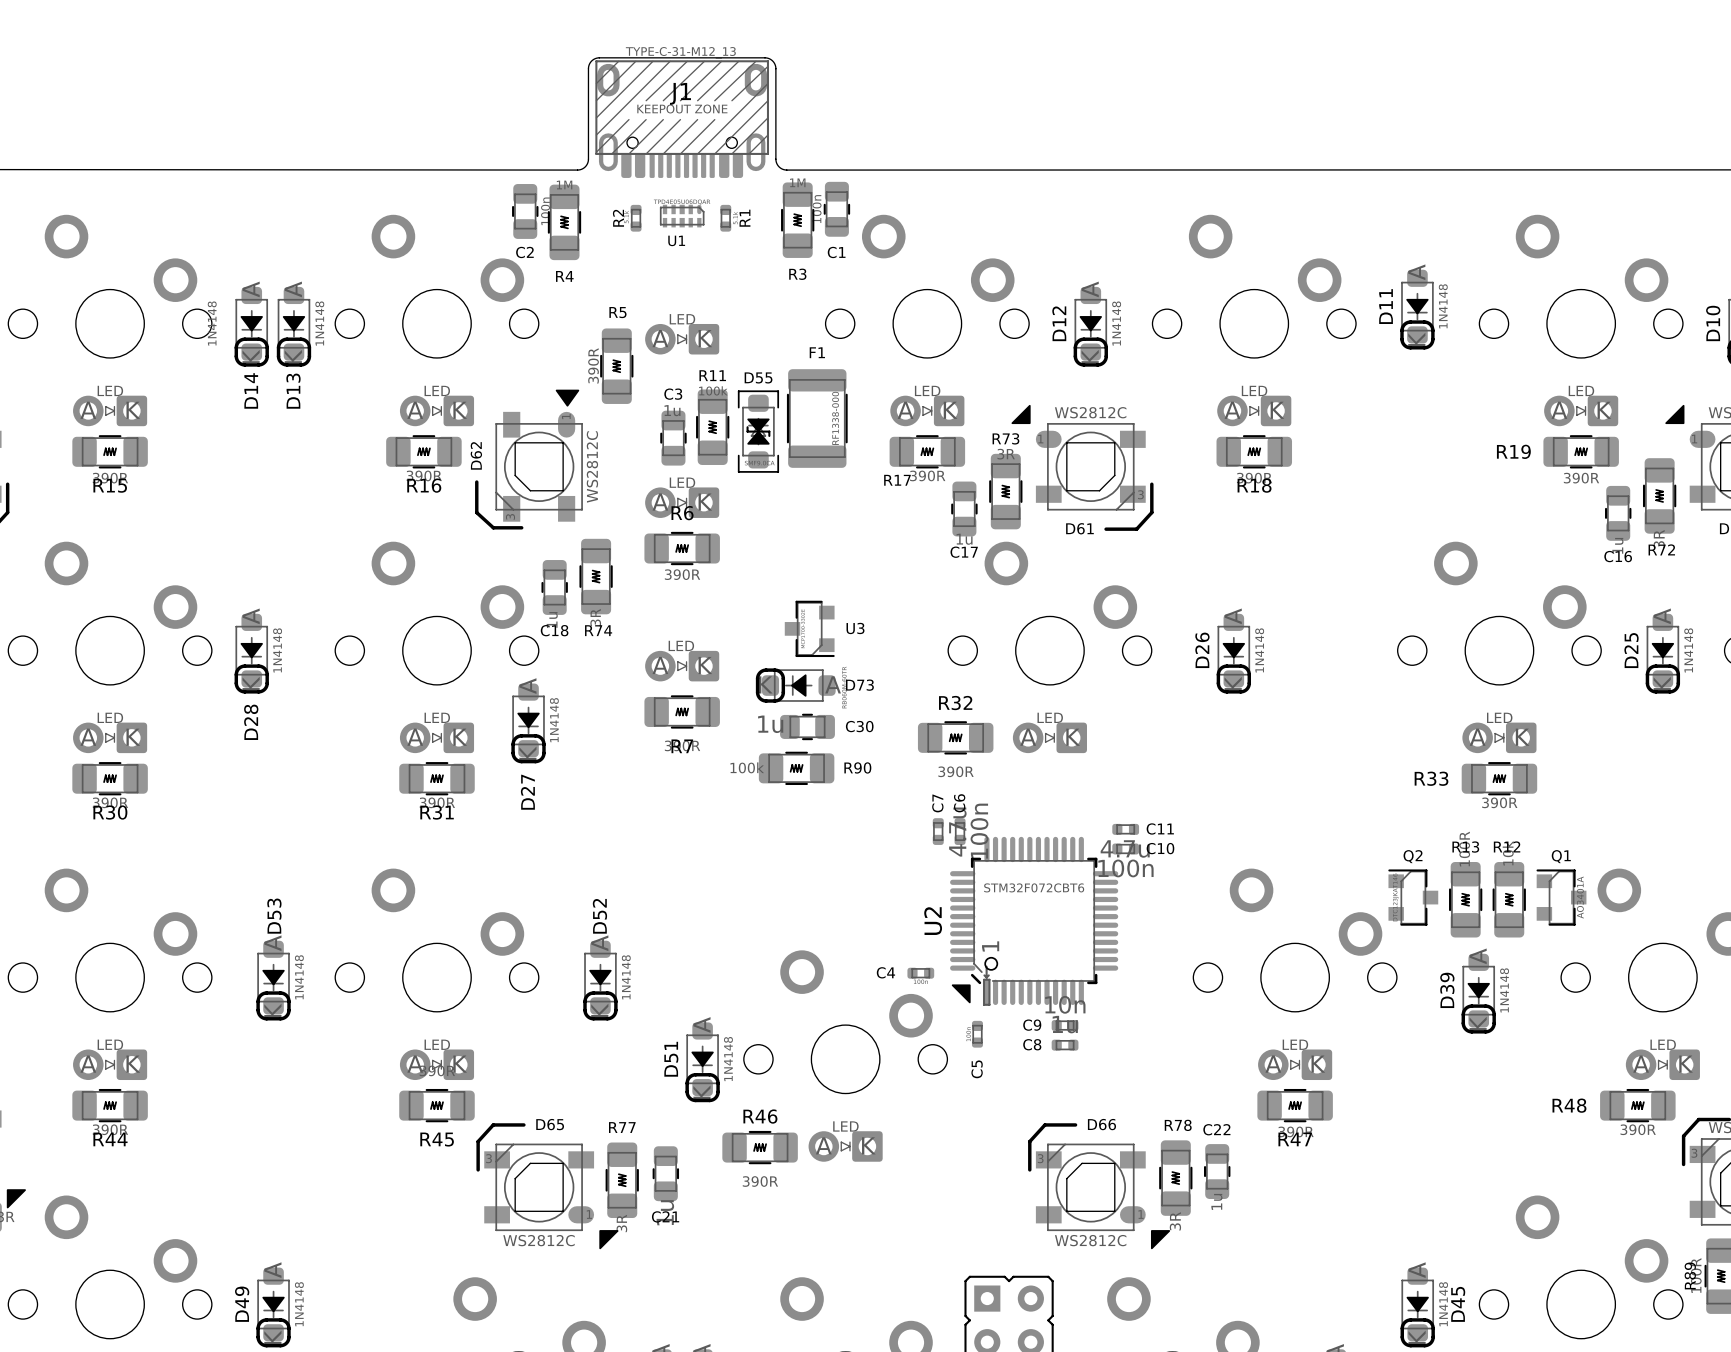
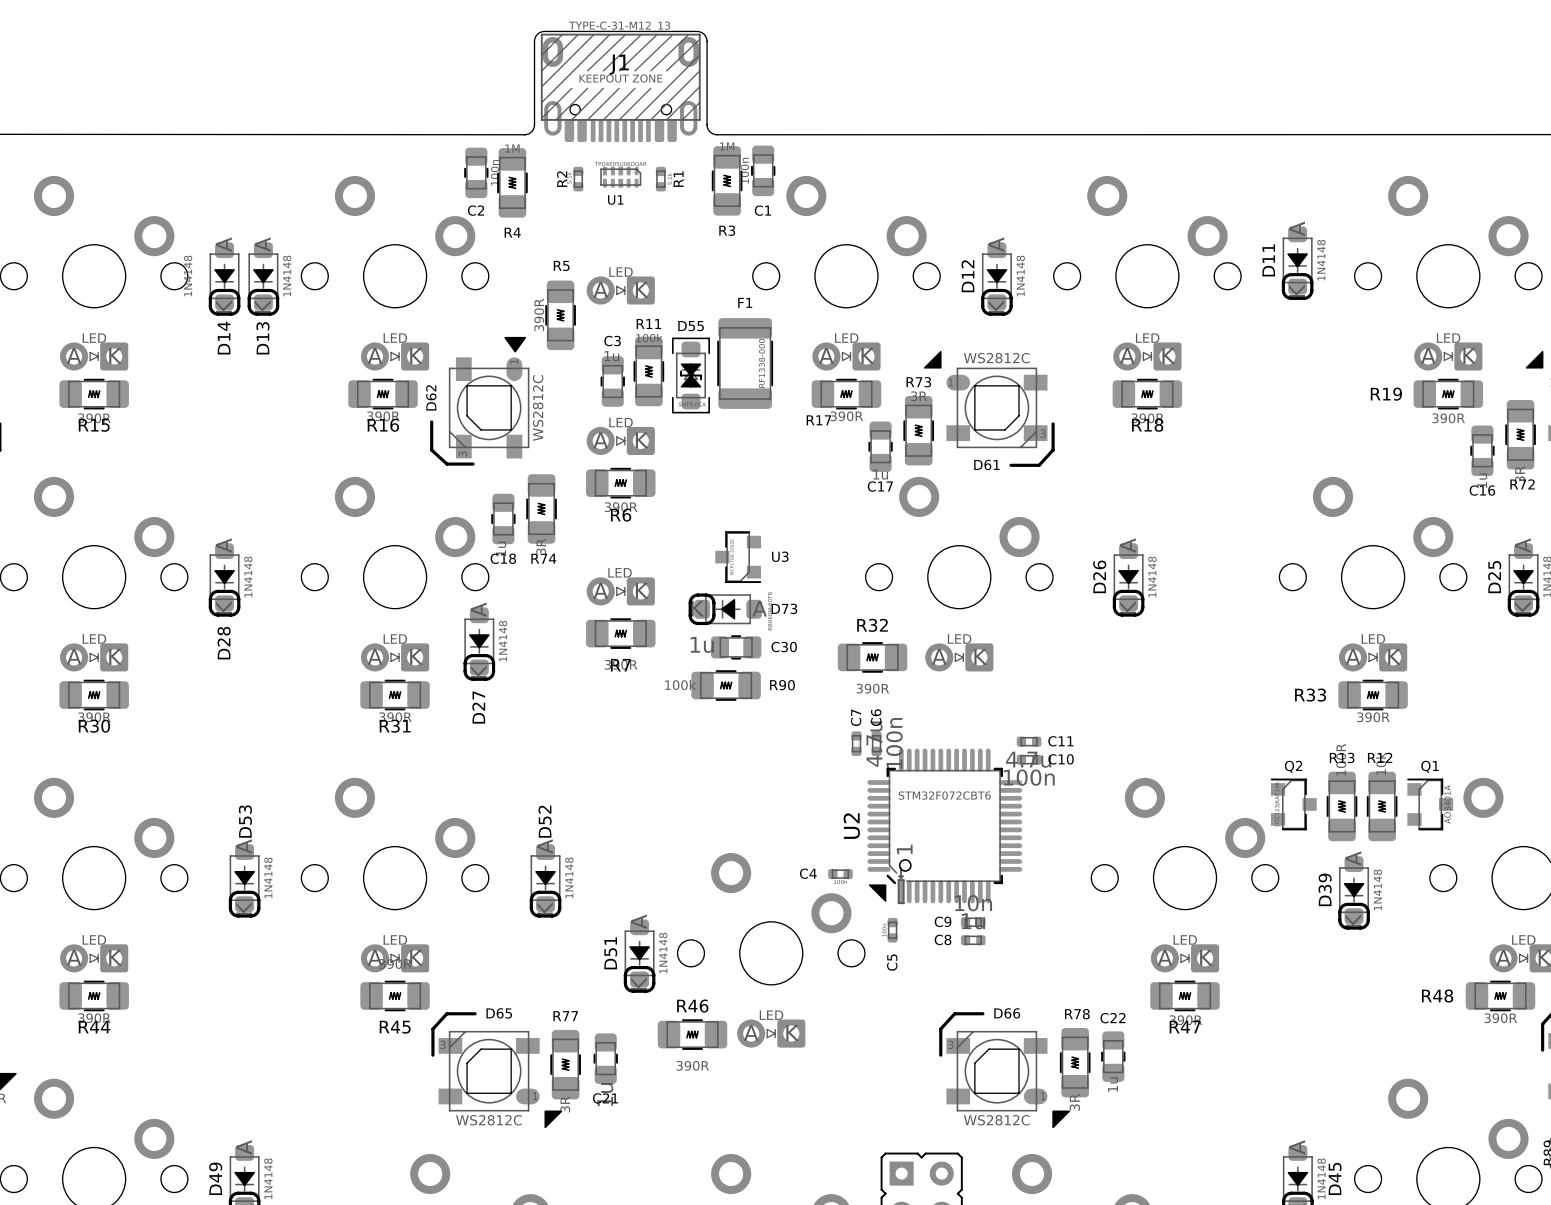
R6 name position: R6 (682, 513) -> R6 (621, 515)

